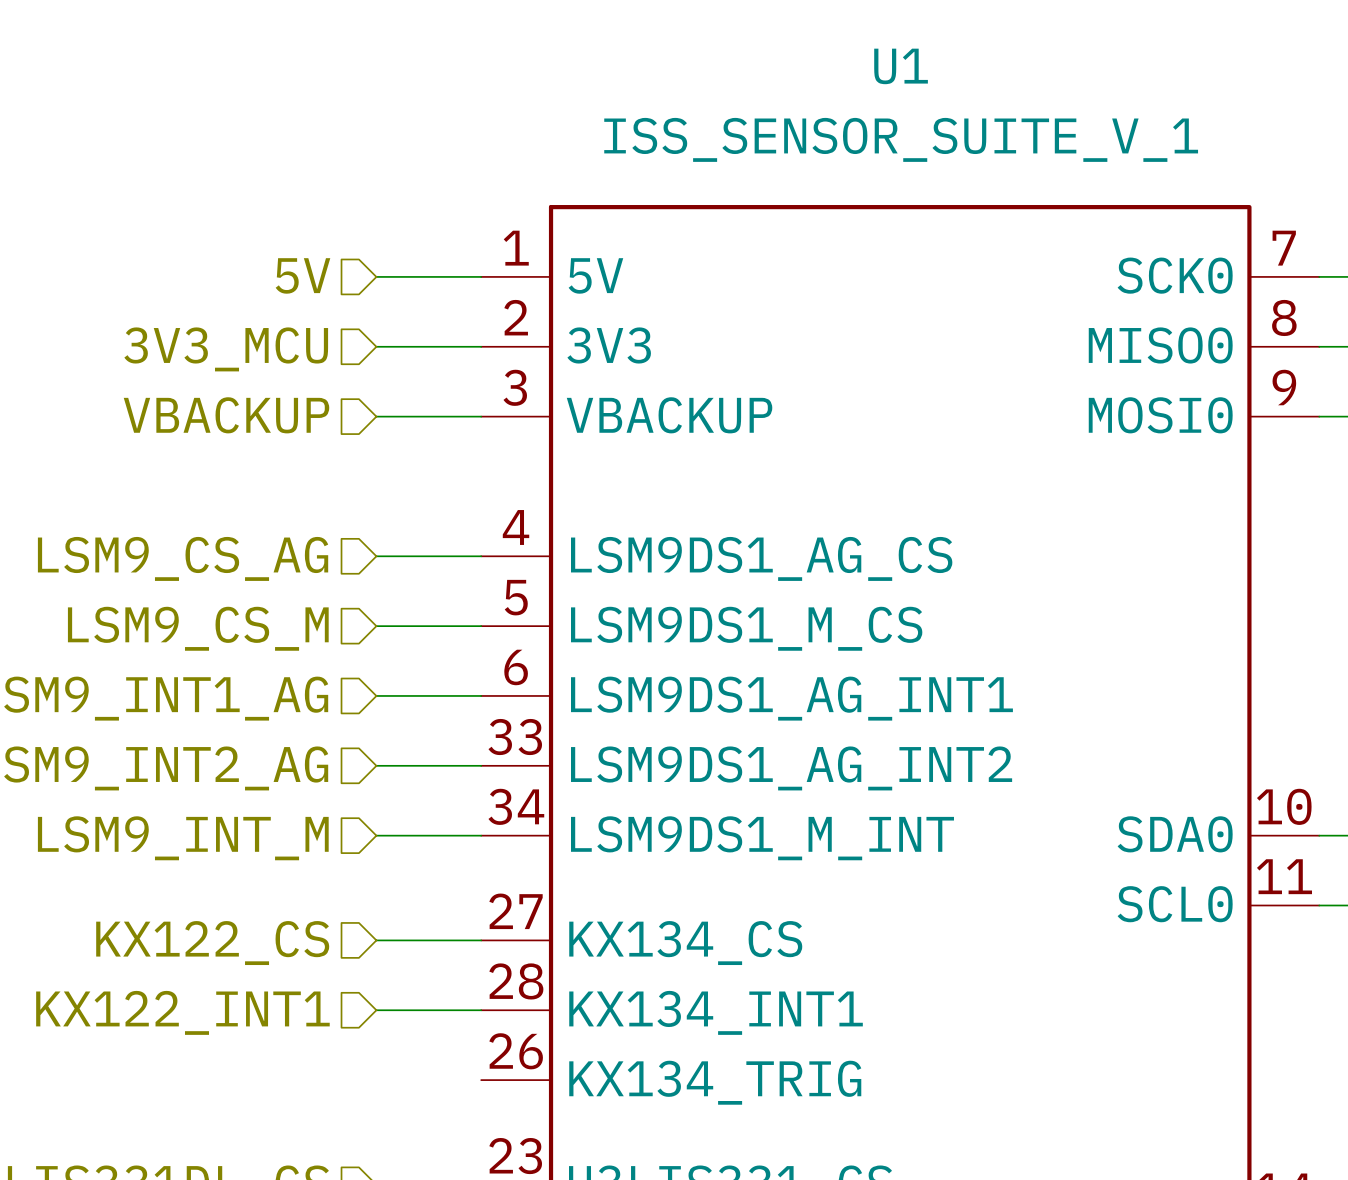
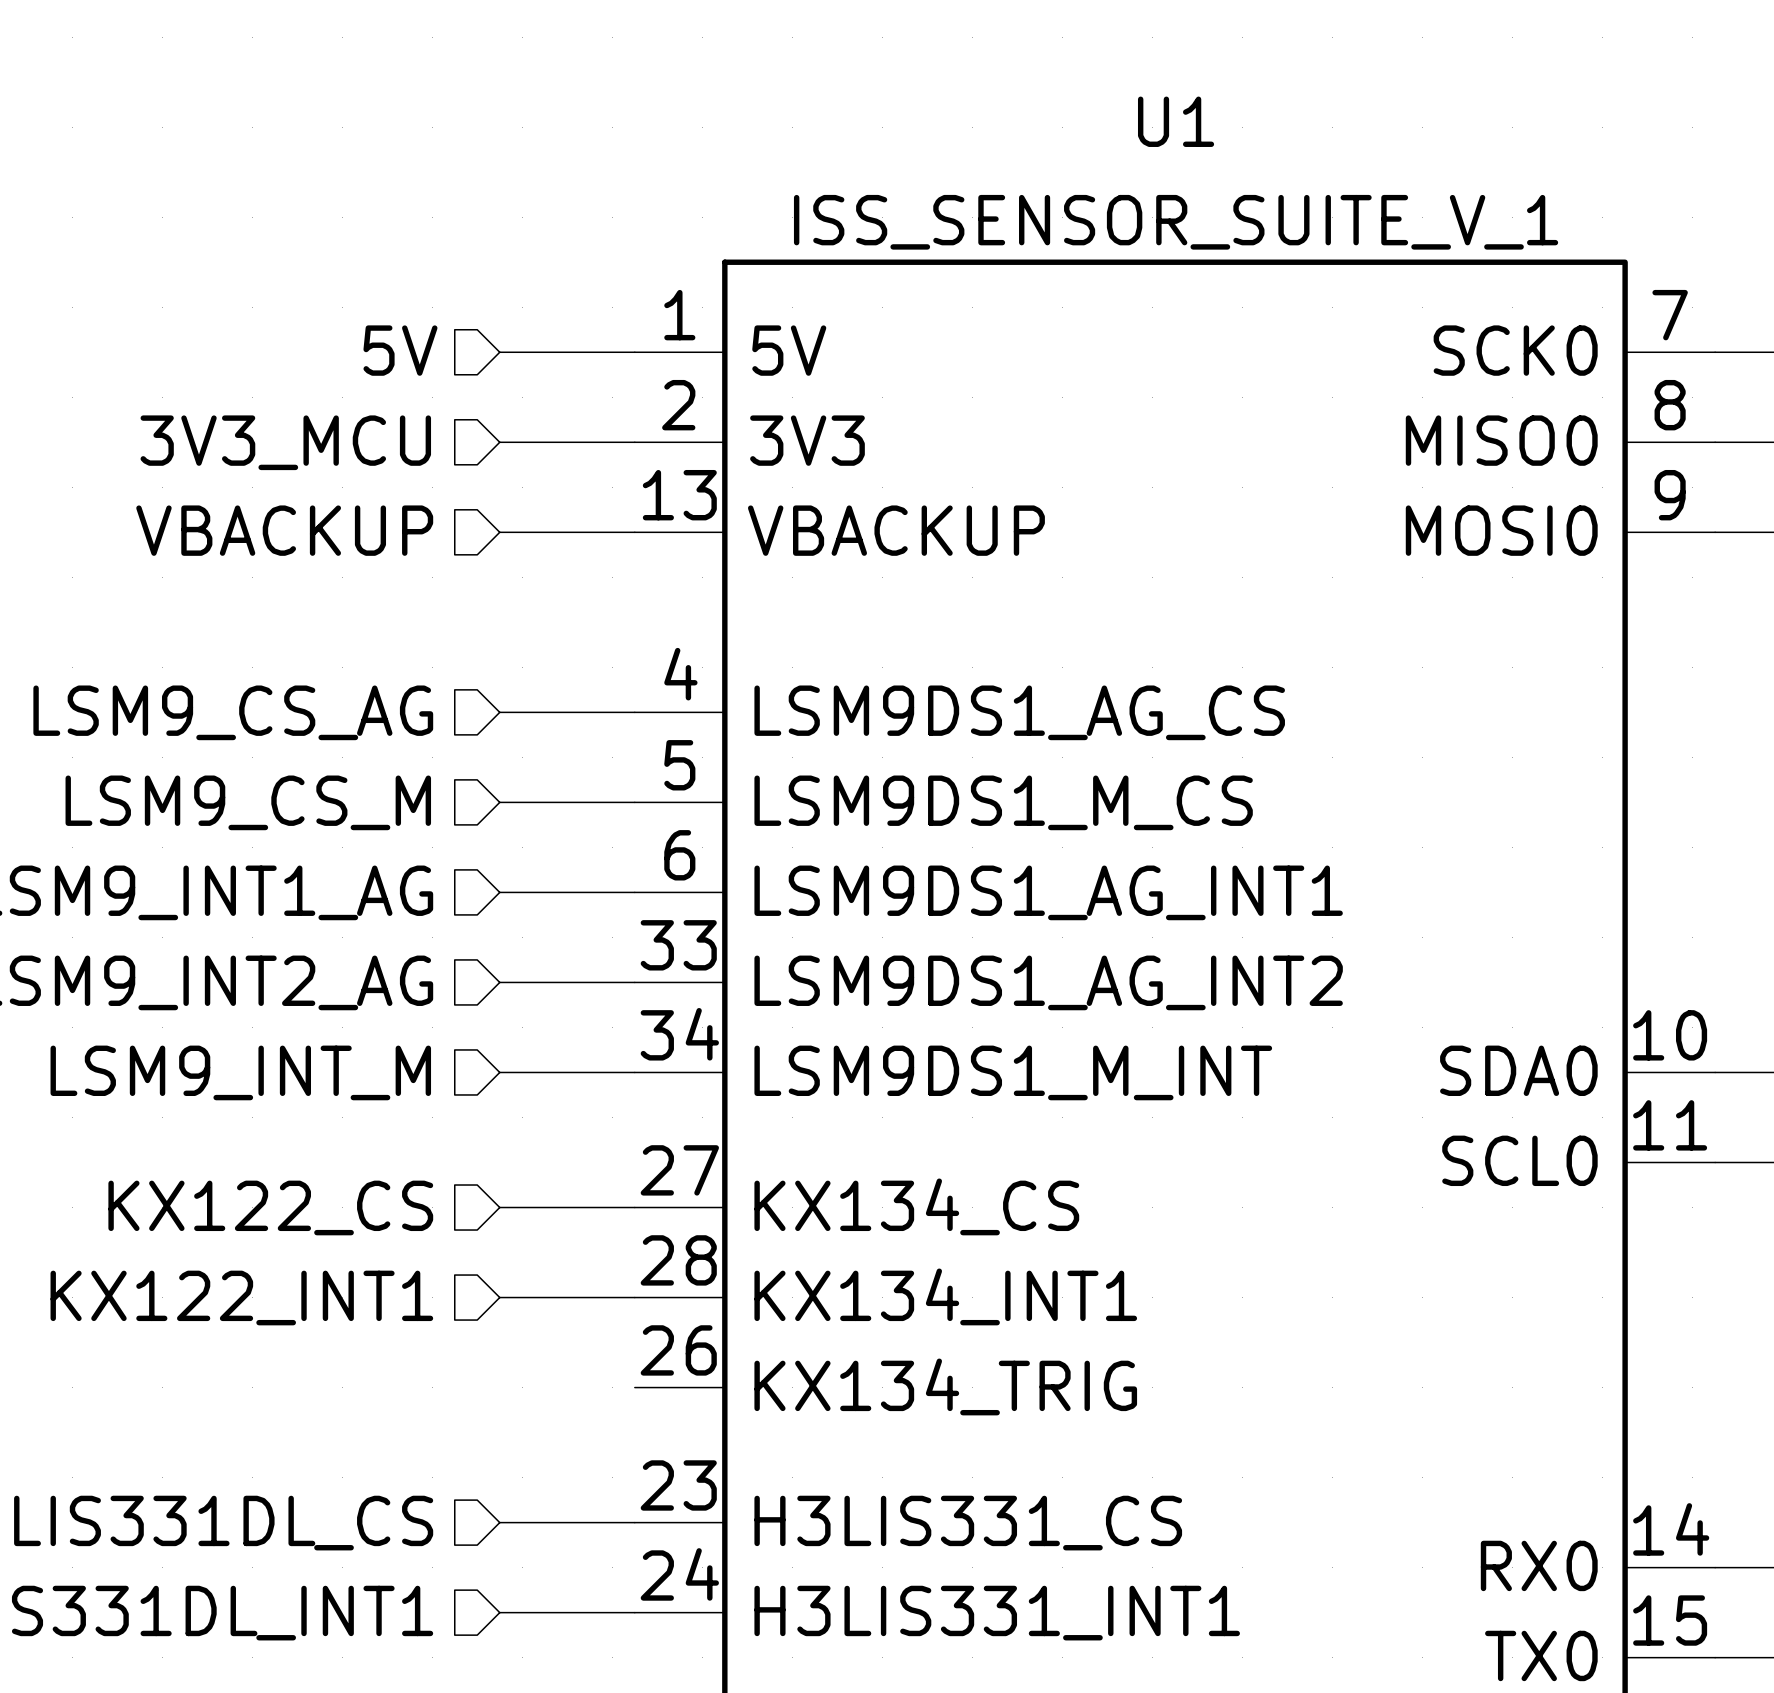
U1 name position: U1 (901, 66) -> U1 (1176, 121)
U1 value position: ISS_SENSOR_SUITE_V_1 (901, 139) -> ISS_SENSOR_SUITE_V_1 (1176, 222)
U1 pin number: 3 (515, 387) -> 13 (679, 495)

